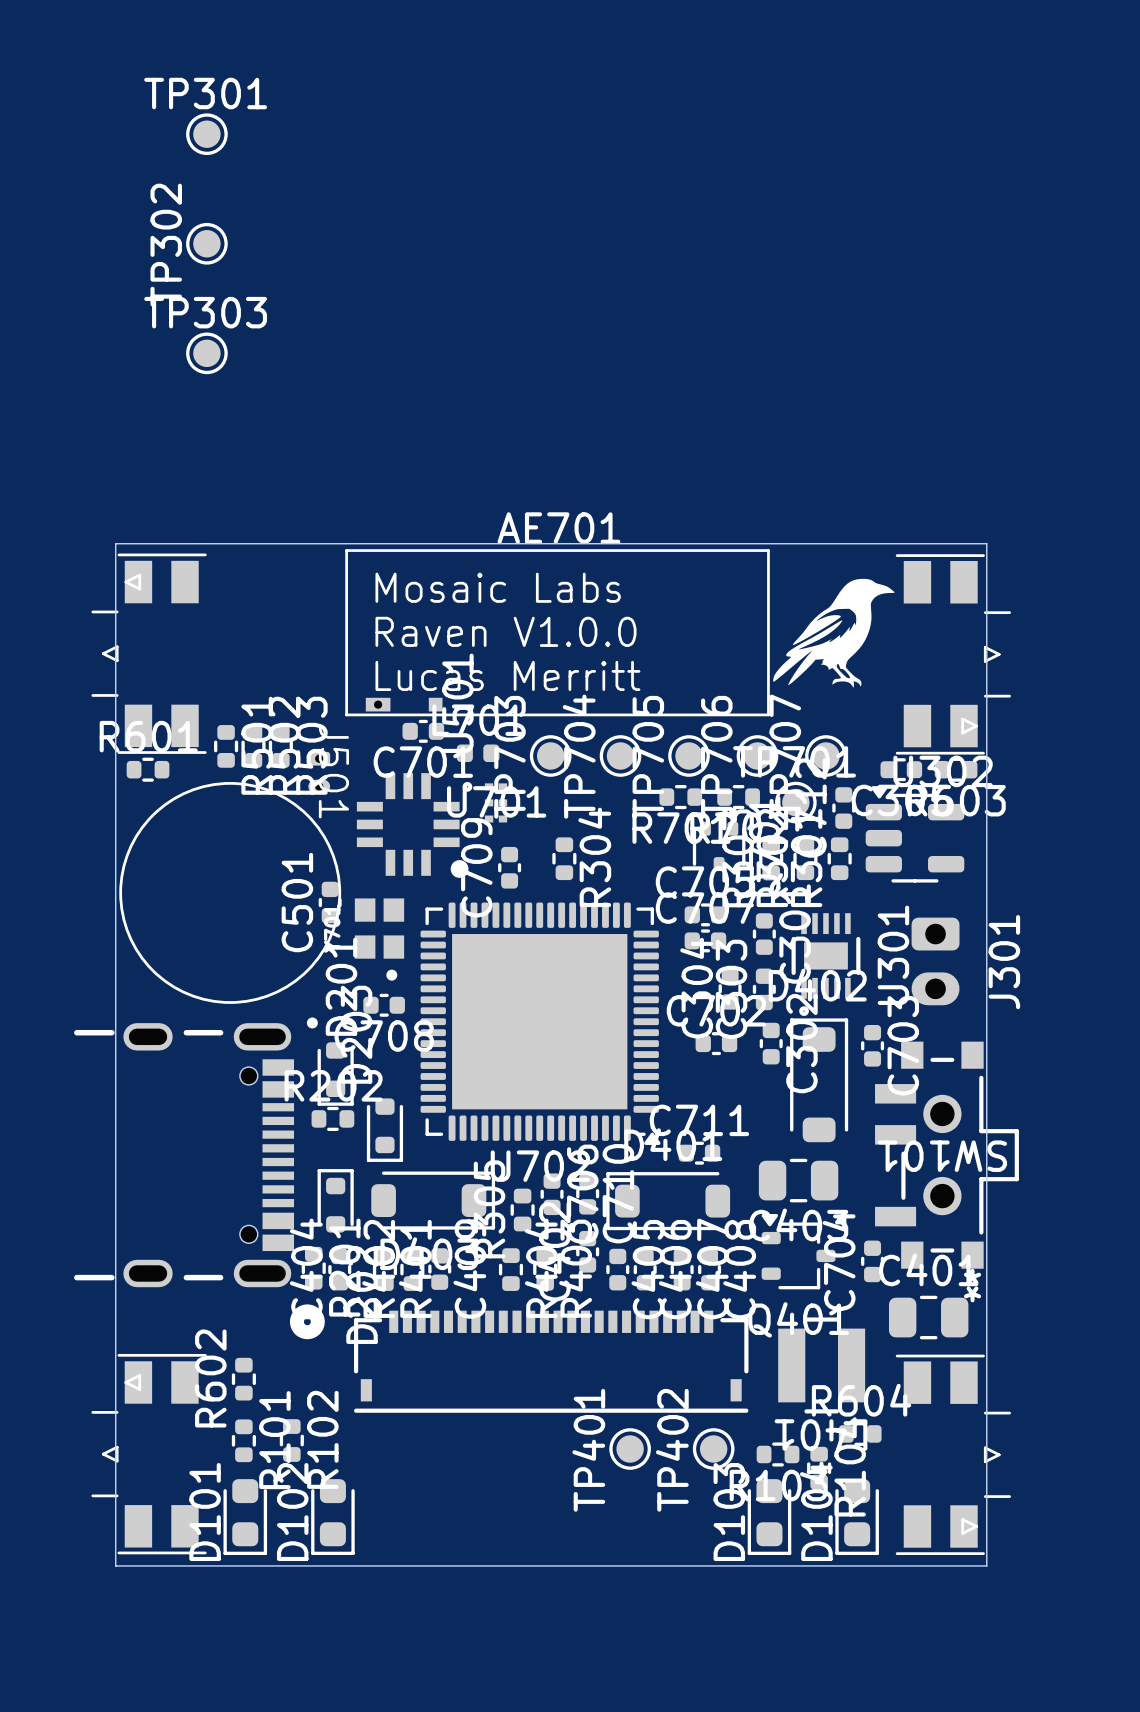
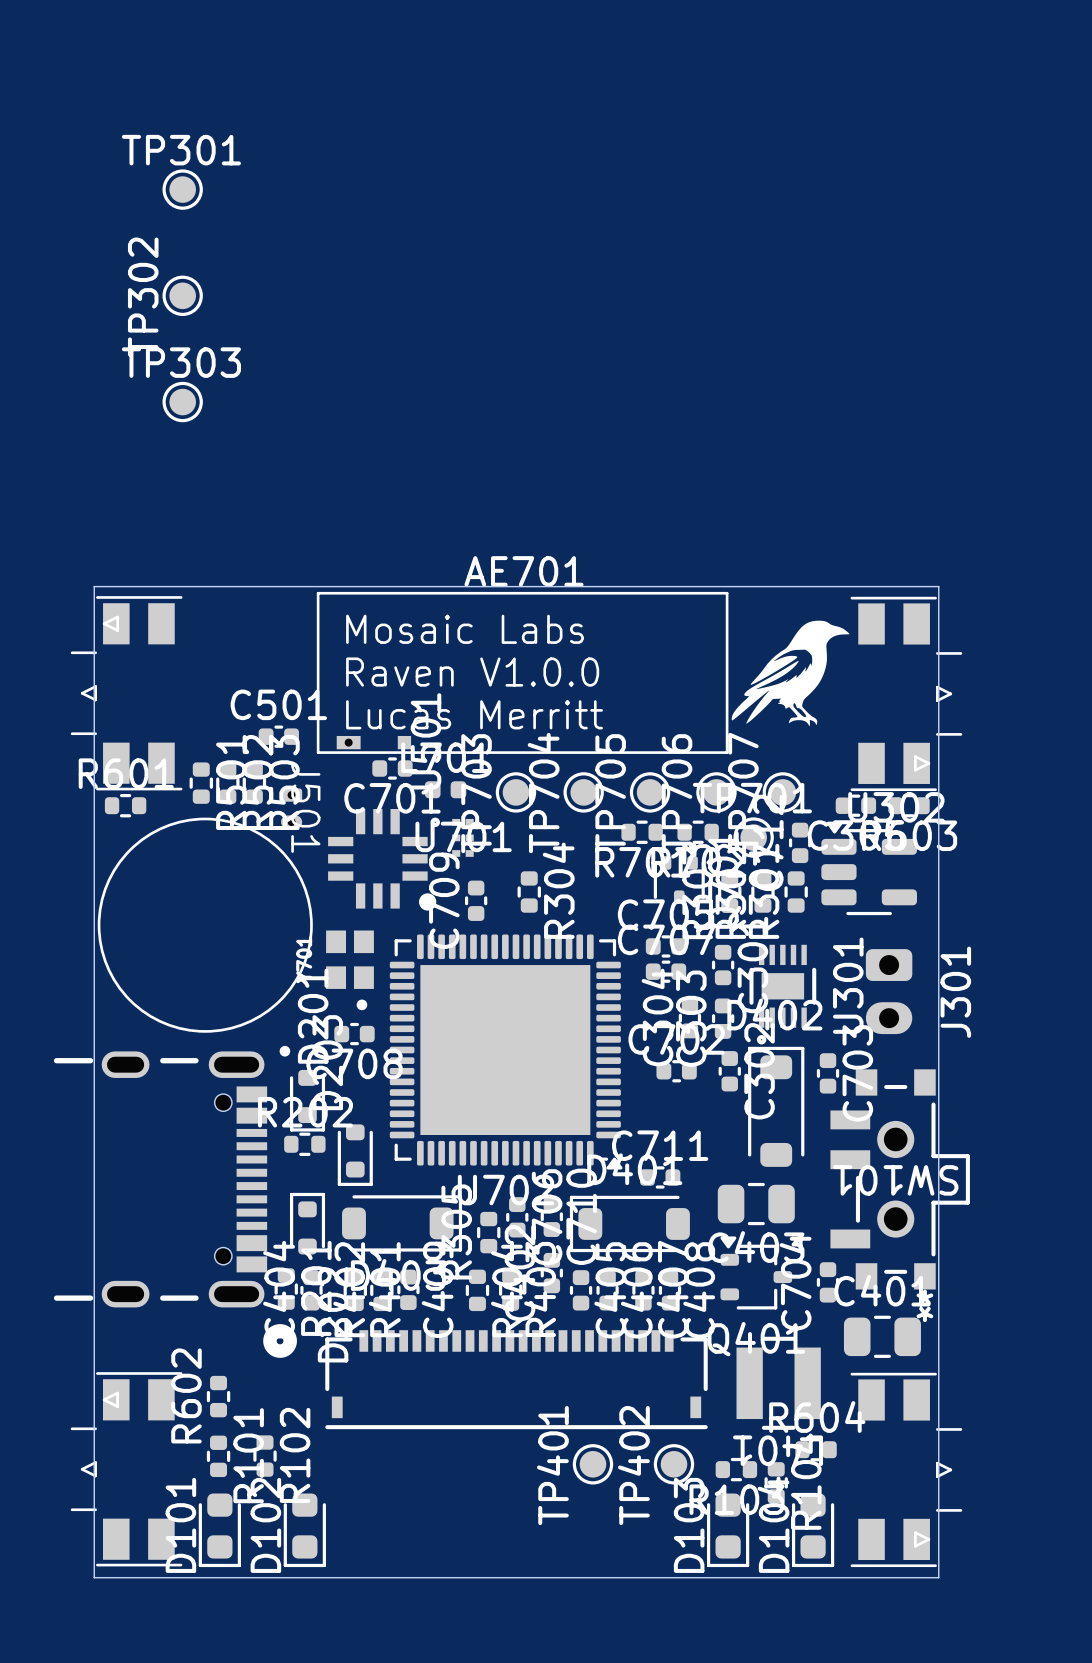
C501 rotation: 0° (330, 902) -> 90° clockwise (278, 736)
C501 position: (330, 902) -> (278, 736)

